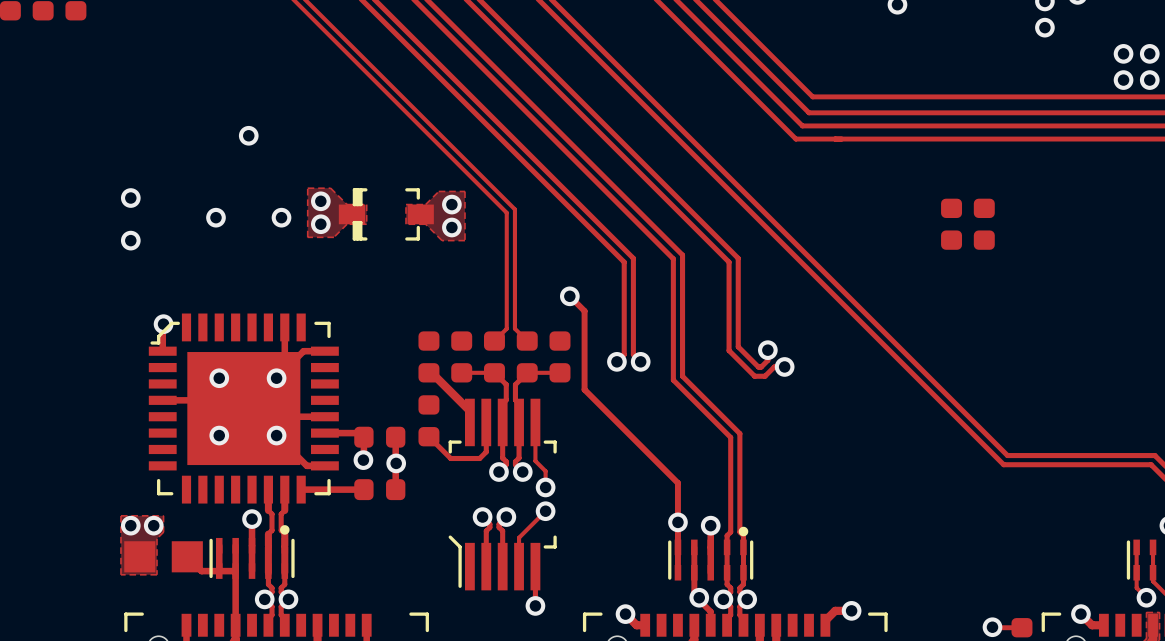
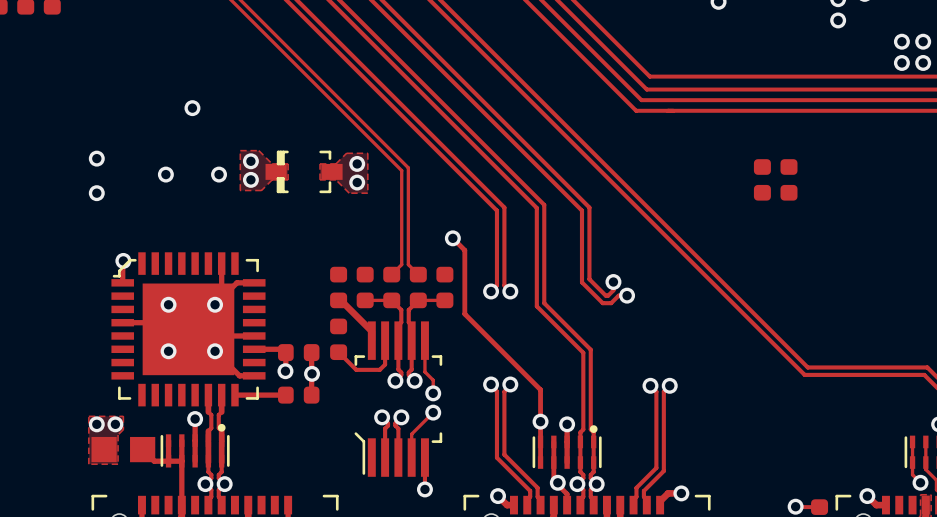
track: none -> (491, 384) (496, 391) (496, 457) (530, 490) (527, 505)
via: none -> (491, 384)
track: none -> (510, 384) (504, 391) (504, 454) (537, 487) (537, 496) (540, 499) (540, 505)
via: none -> (510, 384)
track: none -> (650, 385) (656, 391) (656, 467) (636, 487) (636, 496) (633, 499) (633, 505)
via: none -> (650, 385)
track: none -> (669, 385) (663, 391) (663, 471) (643, 490) (646, 505)
via: none -> (669, 385)

